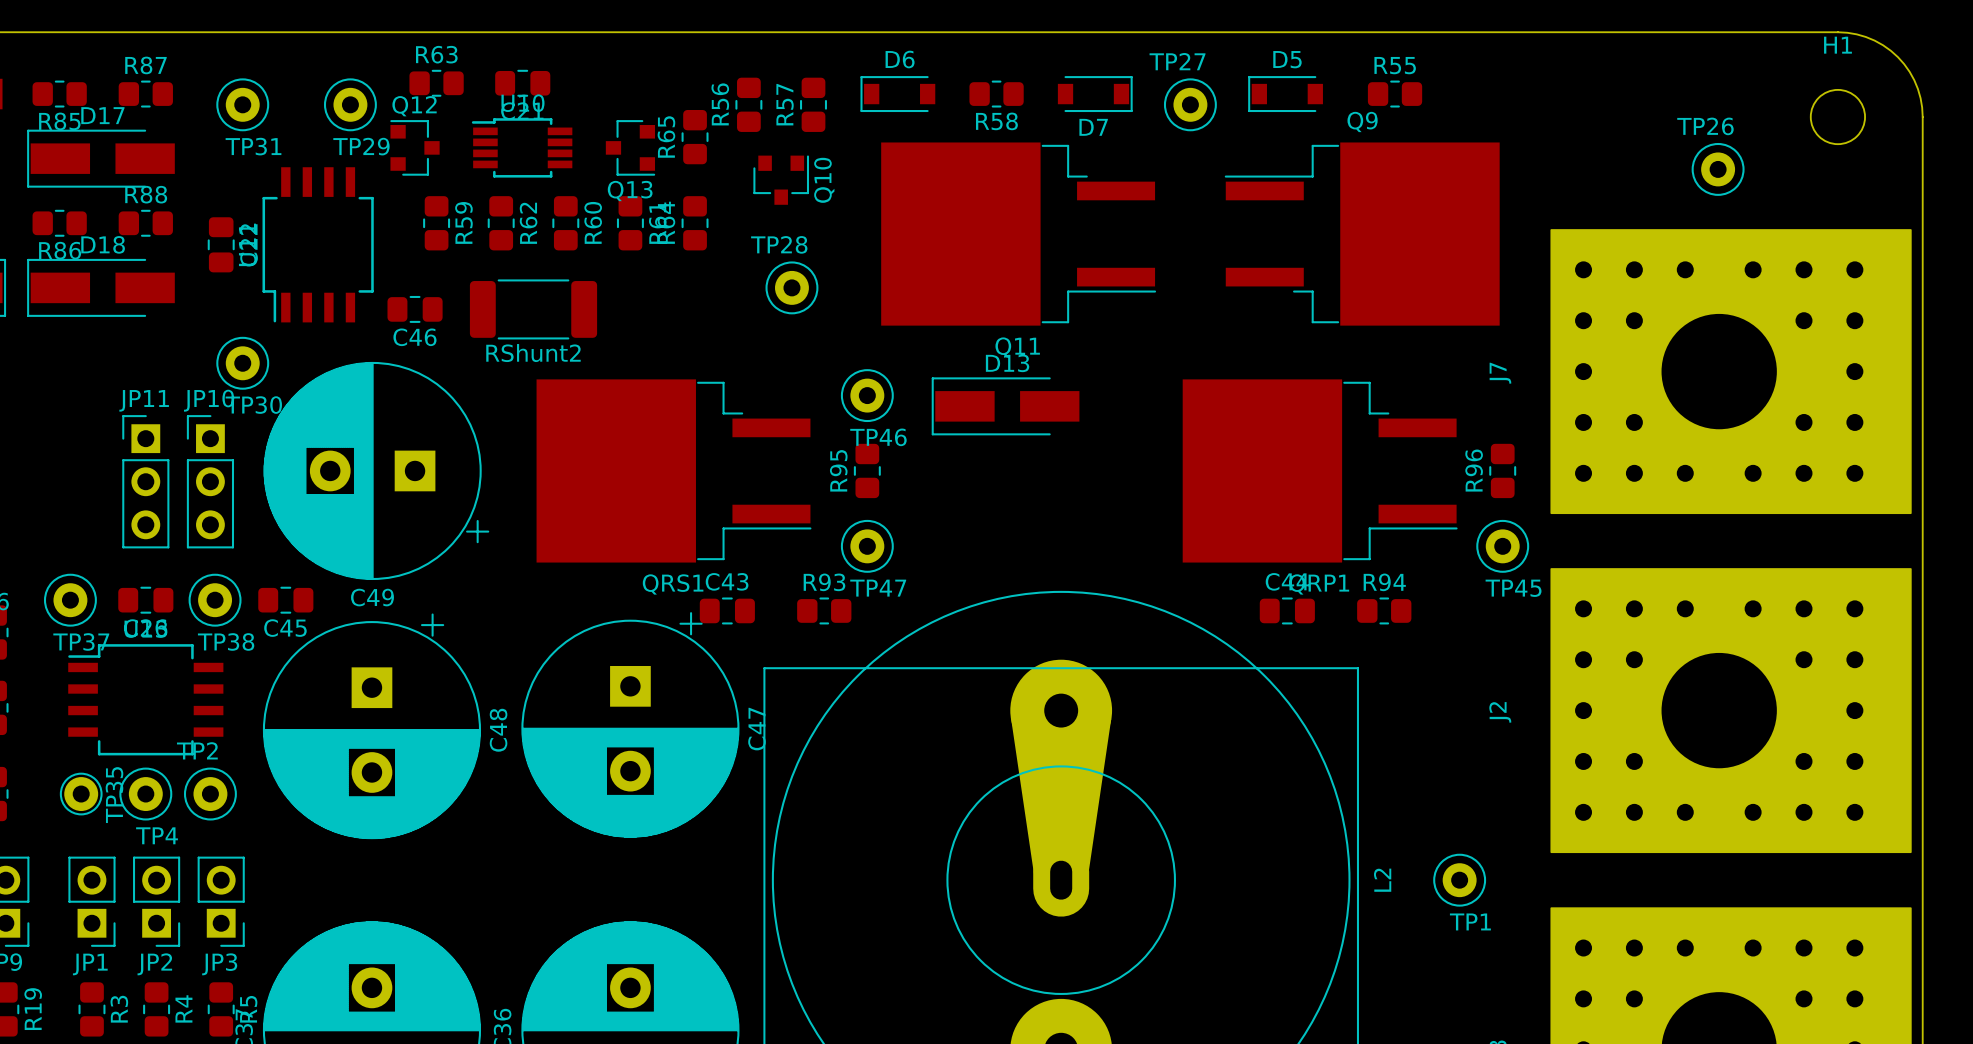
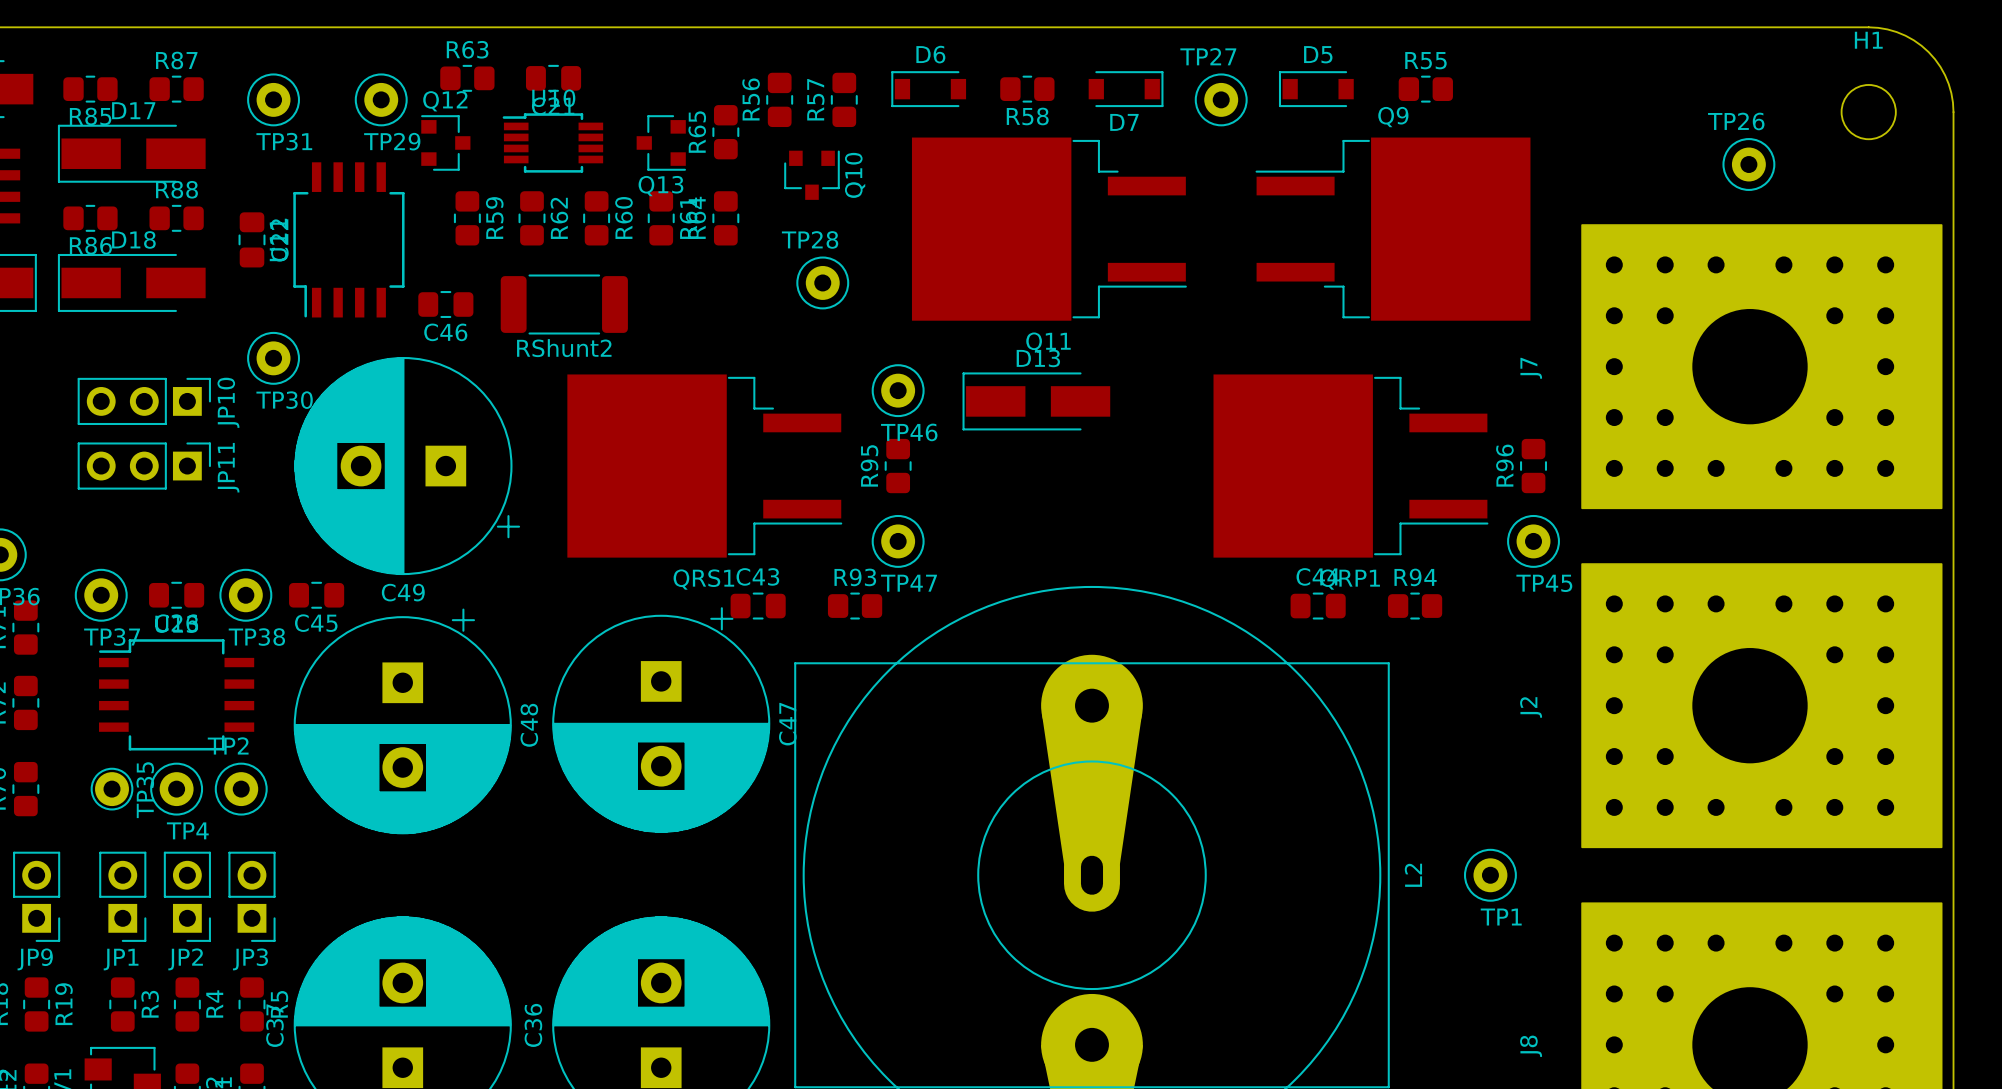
JP11 rotation: 0° (145, 481) -> 90° clockwise (144, 466)
JP10 rotation: 0° (210, 481) -> 90° clockwise (144, 401)
JP10 position: (210, 481) -> (144, 401)

